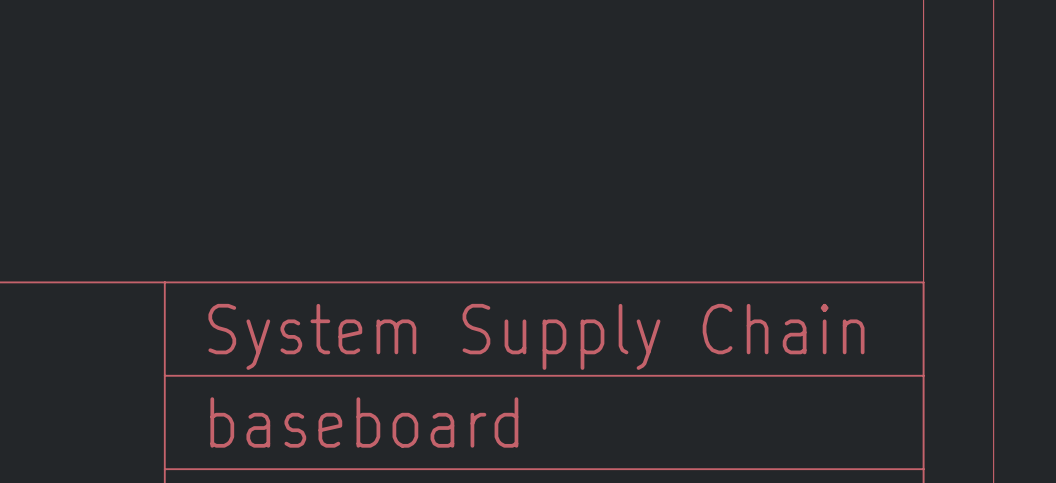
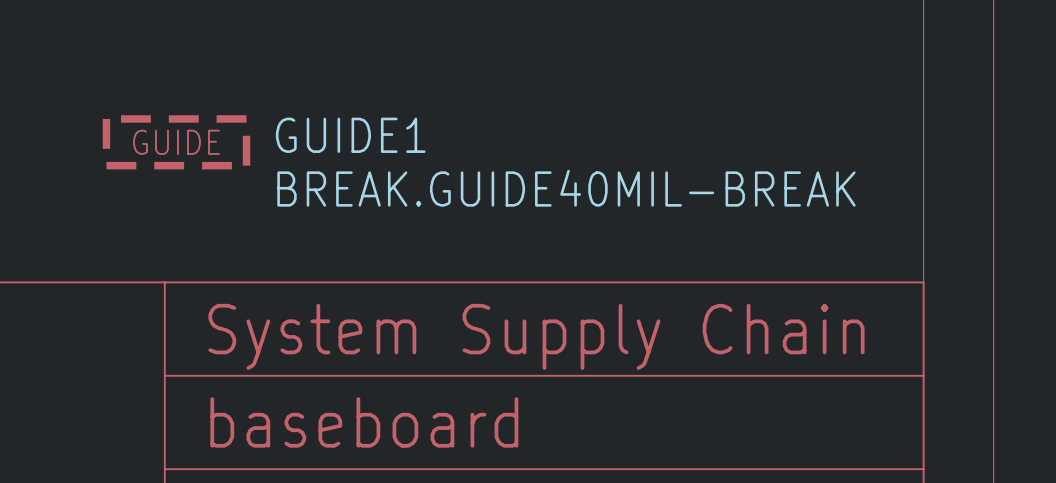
GUIDE1: none -> BREAK.GUIDE40MIL-BREAK (176, 142)

